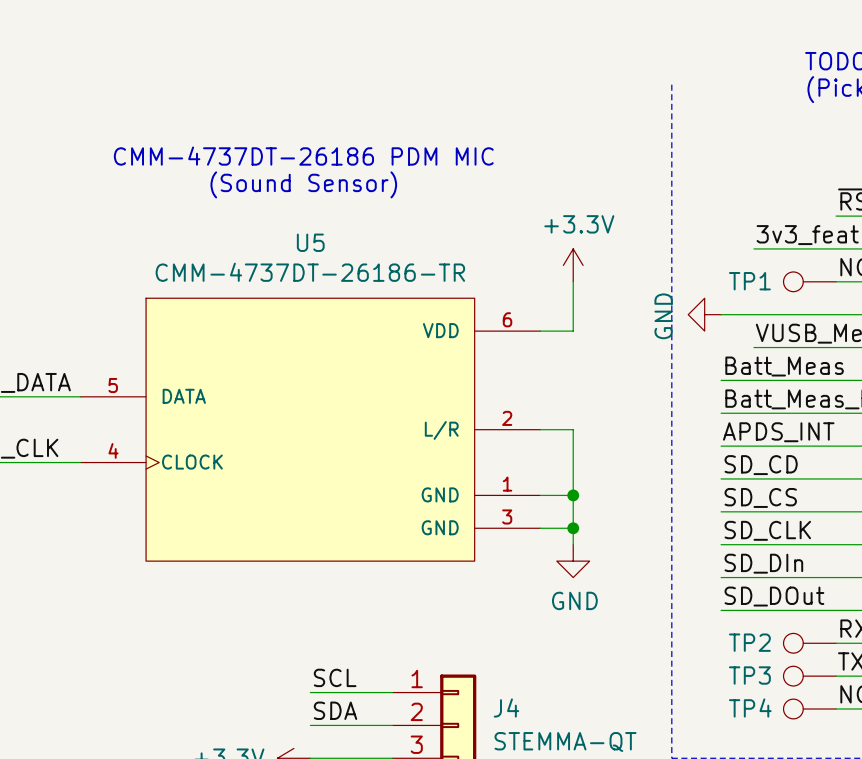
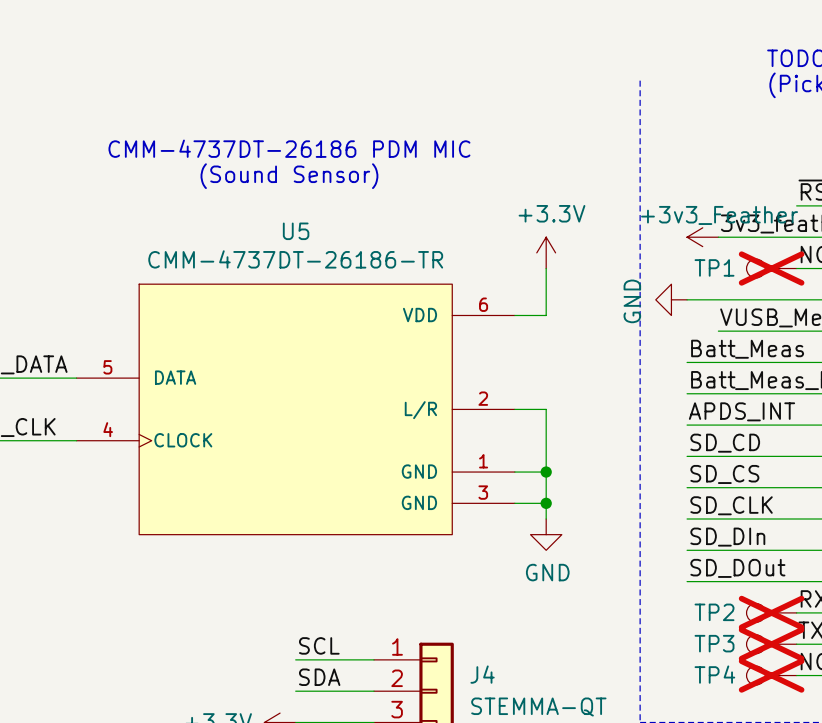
power symbol: none -> +3v3_Feather (702, 237)
TP1 do-not-place cross: none -> (771, 268)
TP2 do-not-place cross: none -> (771, 612)
TP3 do-not-place cross: none -> (771, 644)
TP4 do-not-place cross: none -> (771, 675)

